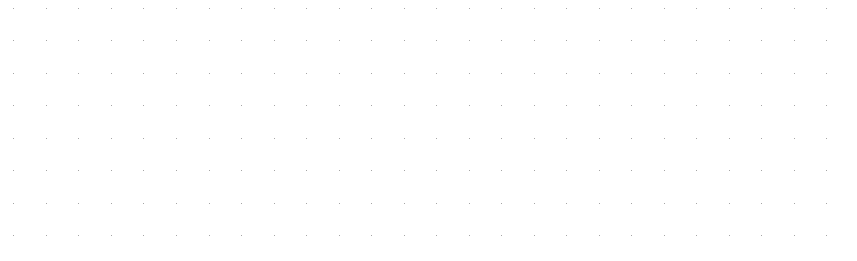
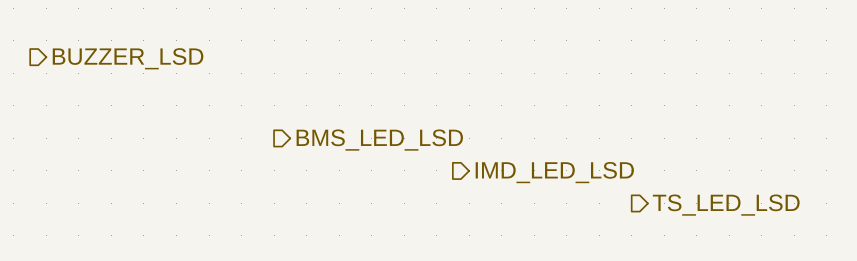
hierarchical label: none -> BUZZER_LSD (128, 58)
hierarchical label: none -> BMS_LED_LSD (379, 140)
hierarchical label: none -> IMD_LED_LSD (554, 172)
hierarchical label: none -> TS_LED_LSD (726, 205)

